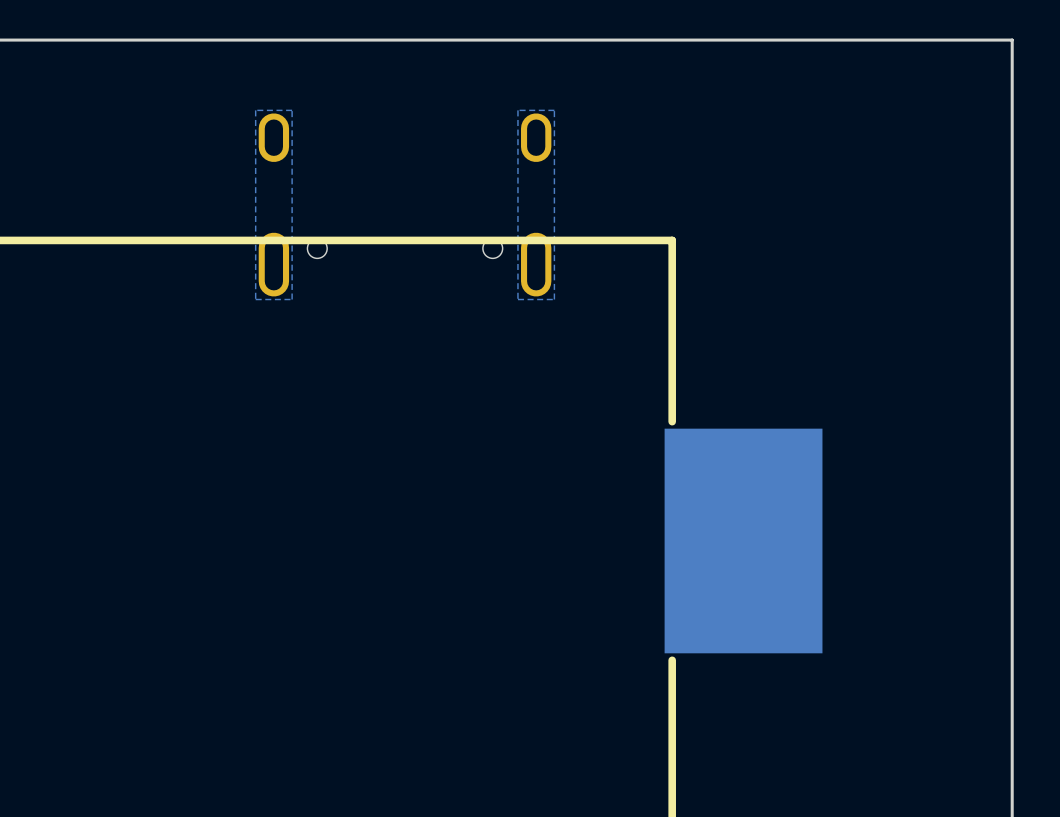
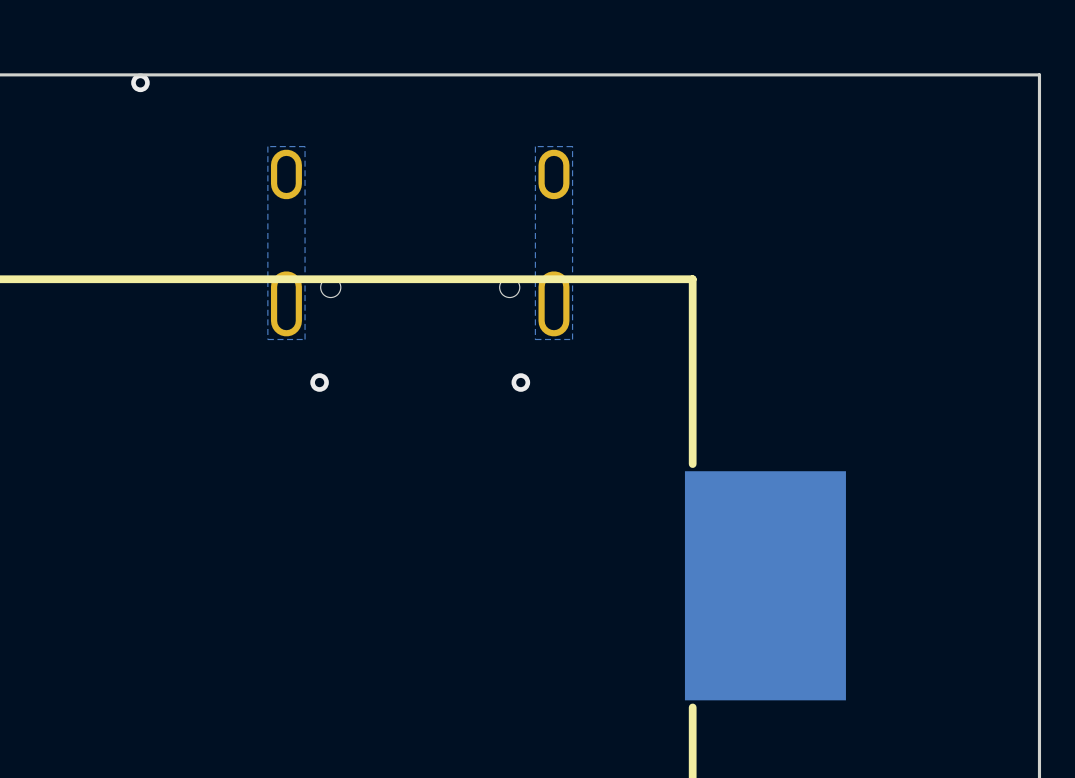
via: none -> (140, 82)
via: none -> (319, 382)
via: none -> (520, 382)

